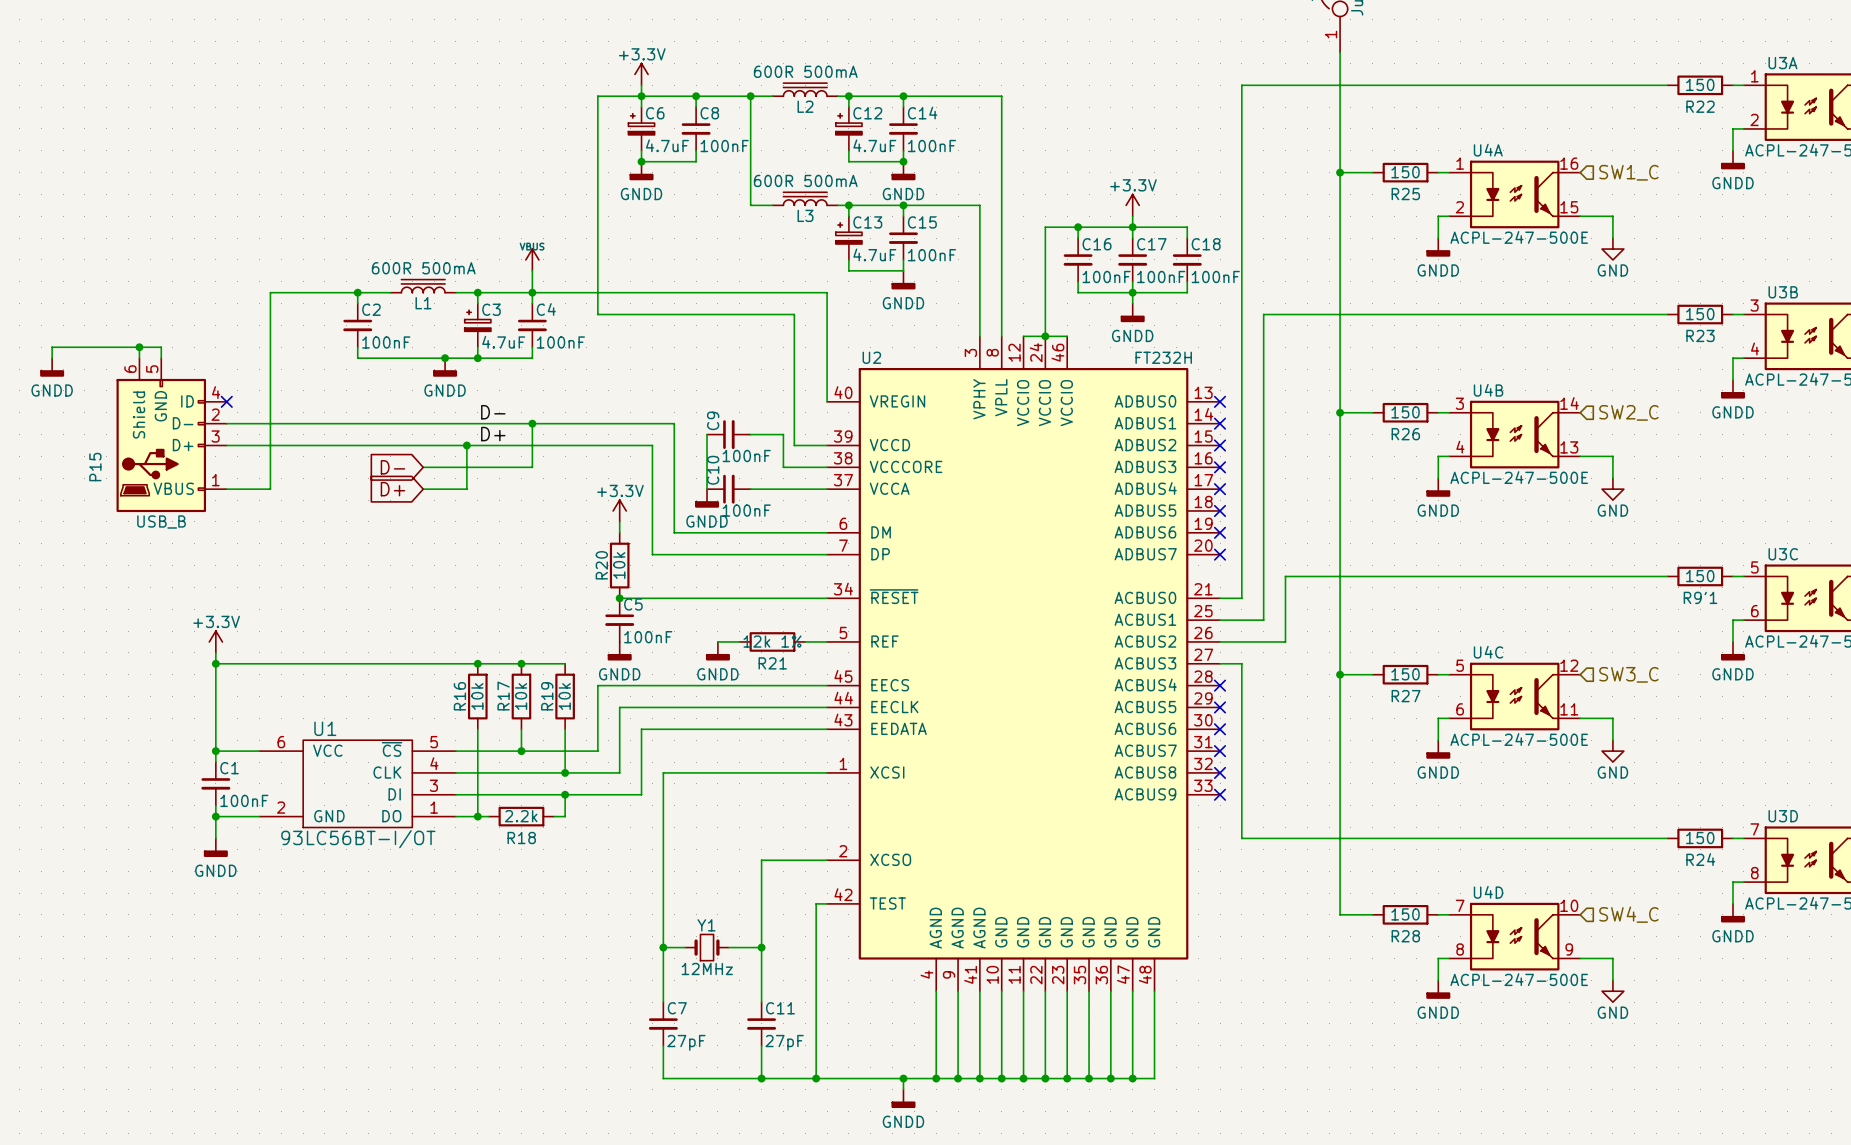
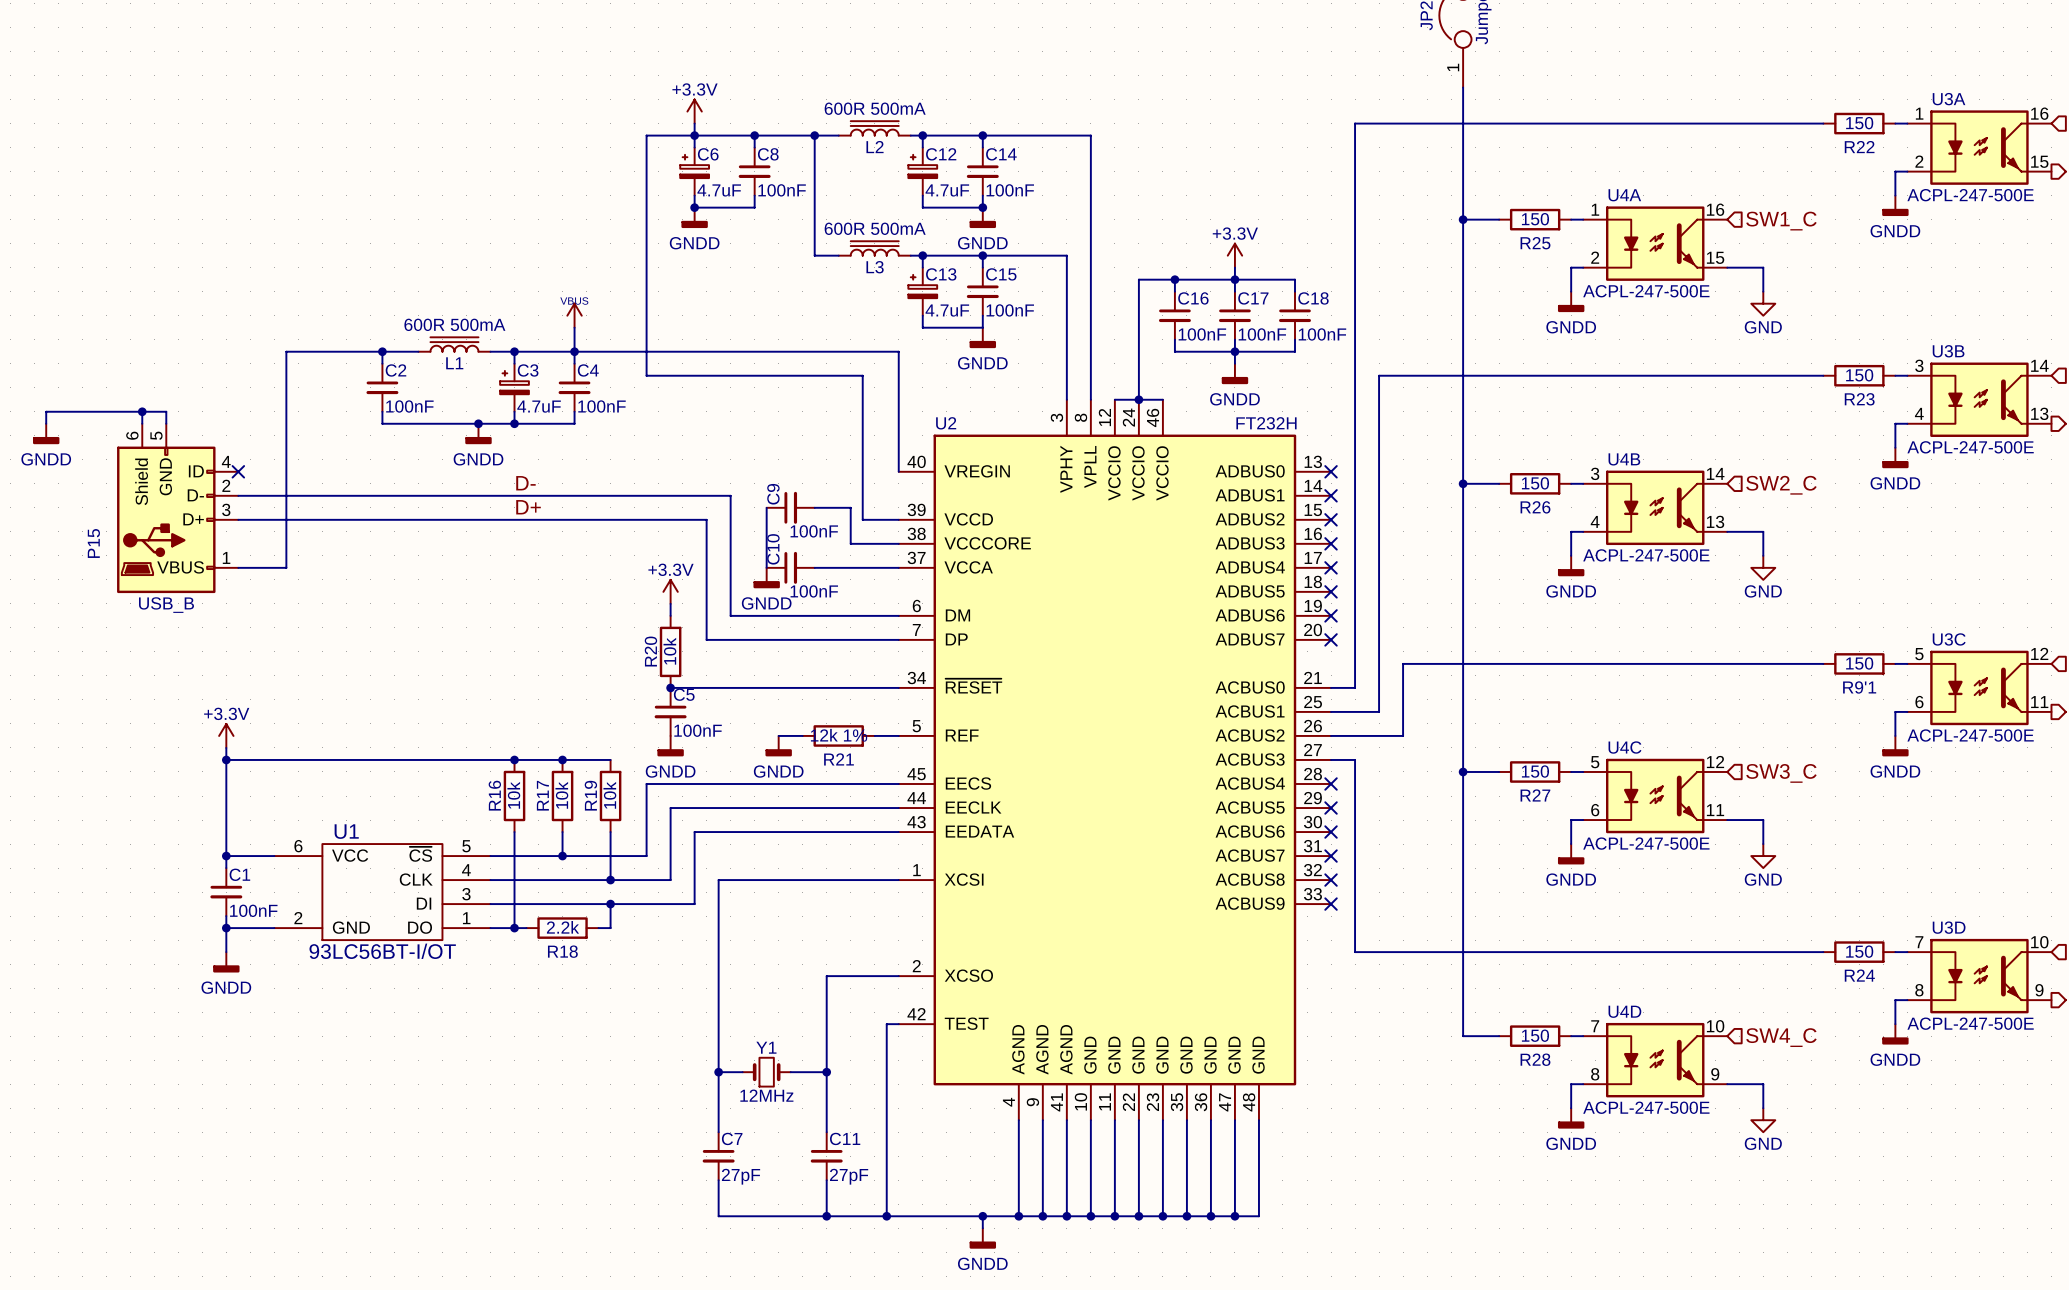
wire: (532, 423) (532, 467) (423, 467) -> none
junction: (532, 423) -> none
wire: (466, 445) (466, 489) (423, 489) -> none
junction: (466, 445) -> none
global label: D- (392, 467) -> none
global label: D+ (392, 489) -> none

